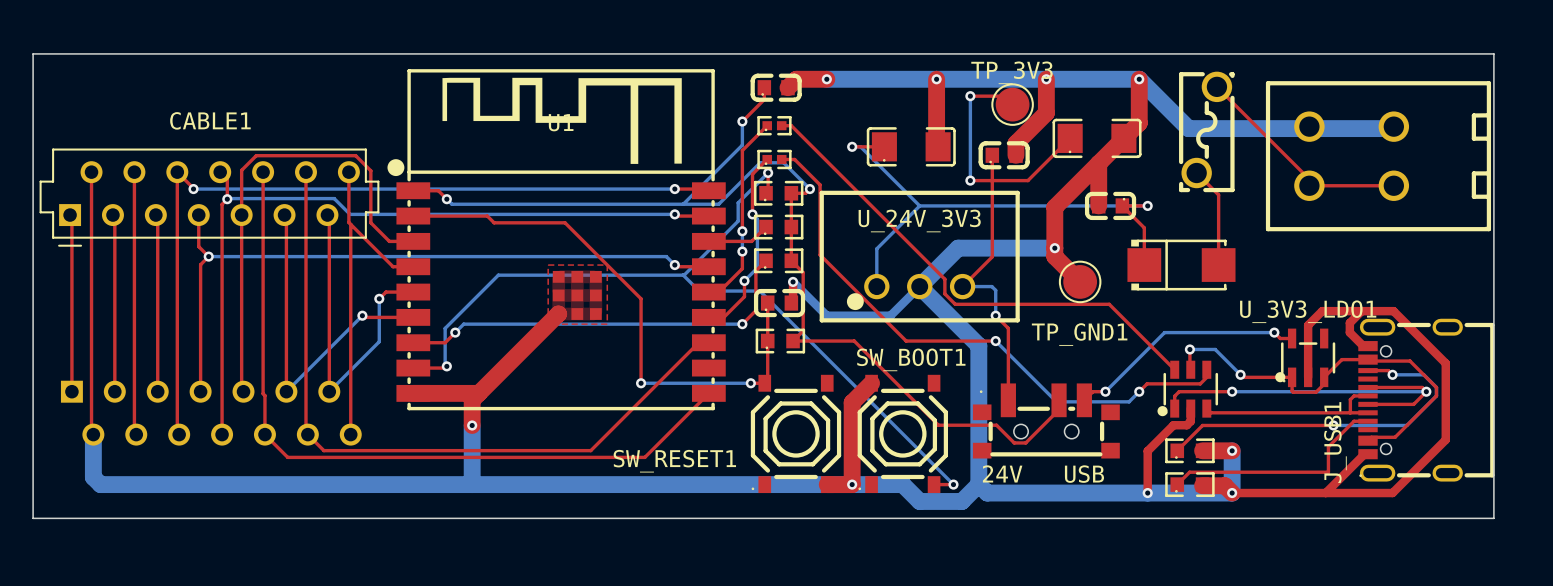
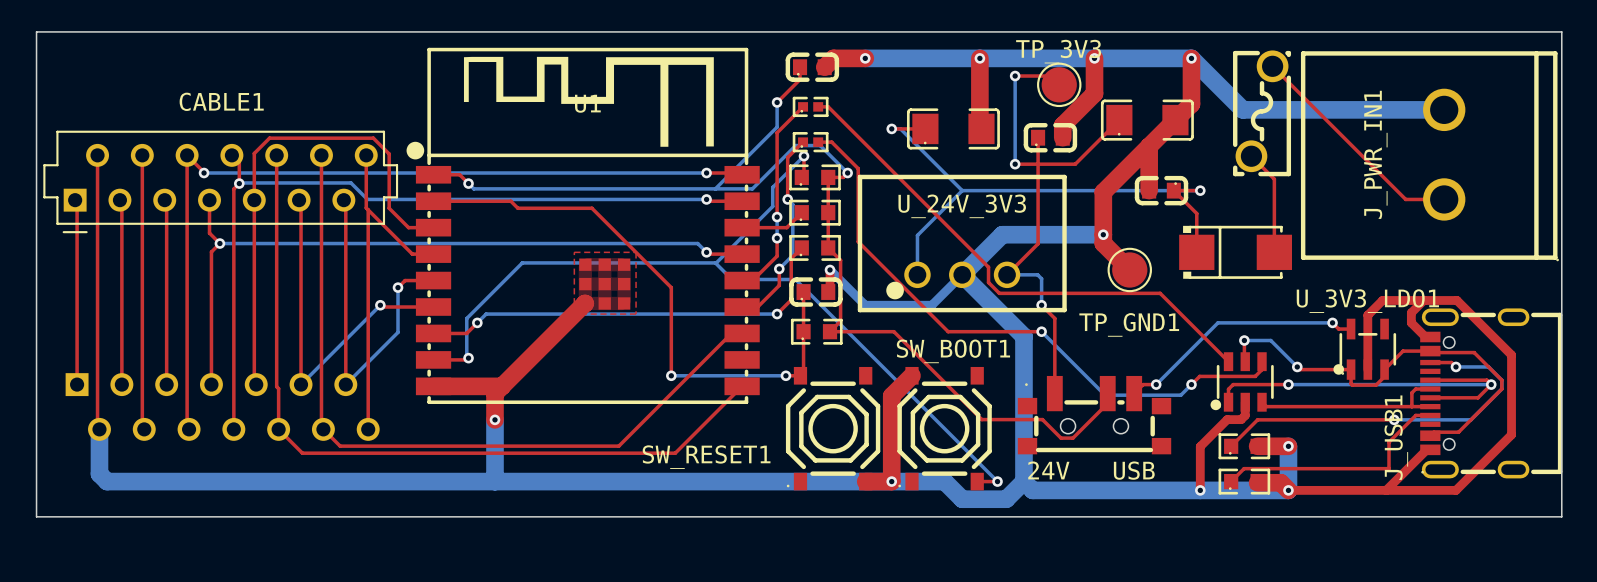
part: (1378, 156) -> none
J_PWR_IN1: none -> (1429, 156)
top track: (1309, 179) (1309, 185) (1393, 185) -> (1369, 162) (1405, 199) (1444, 199)

